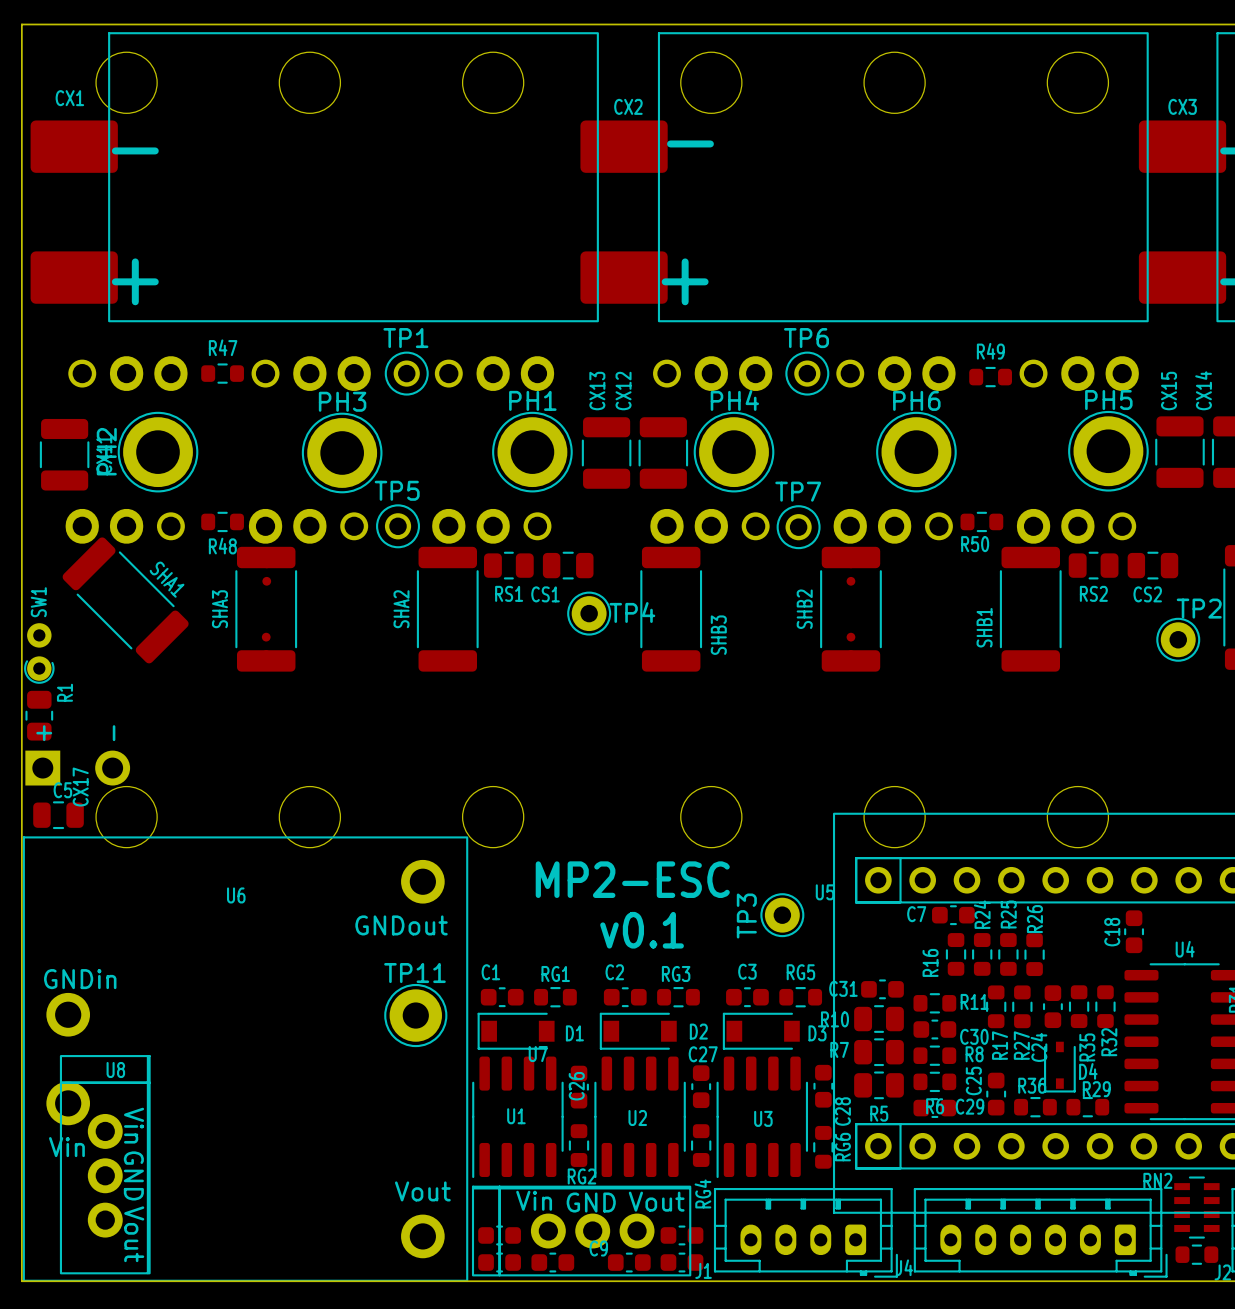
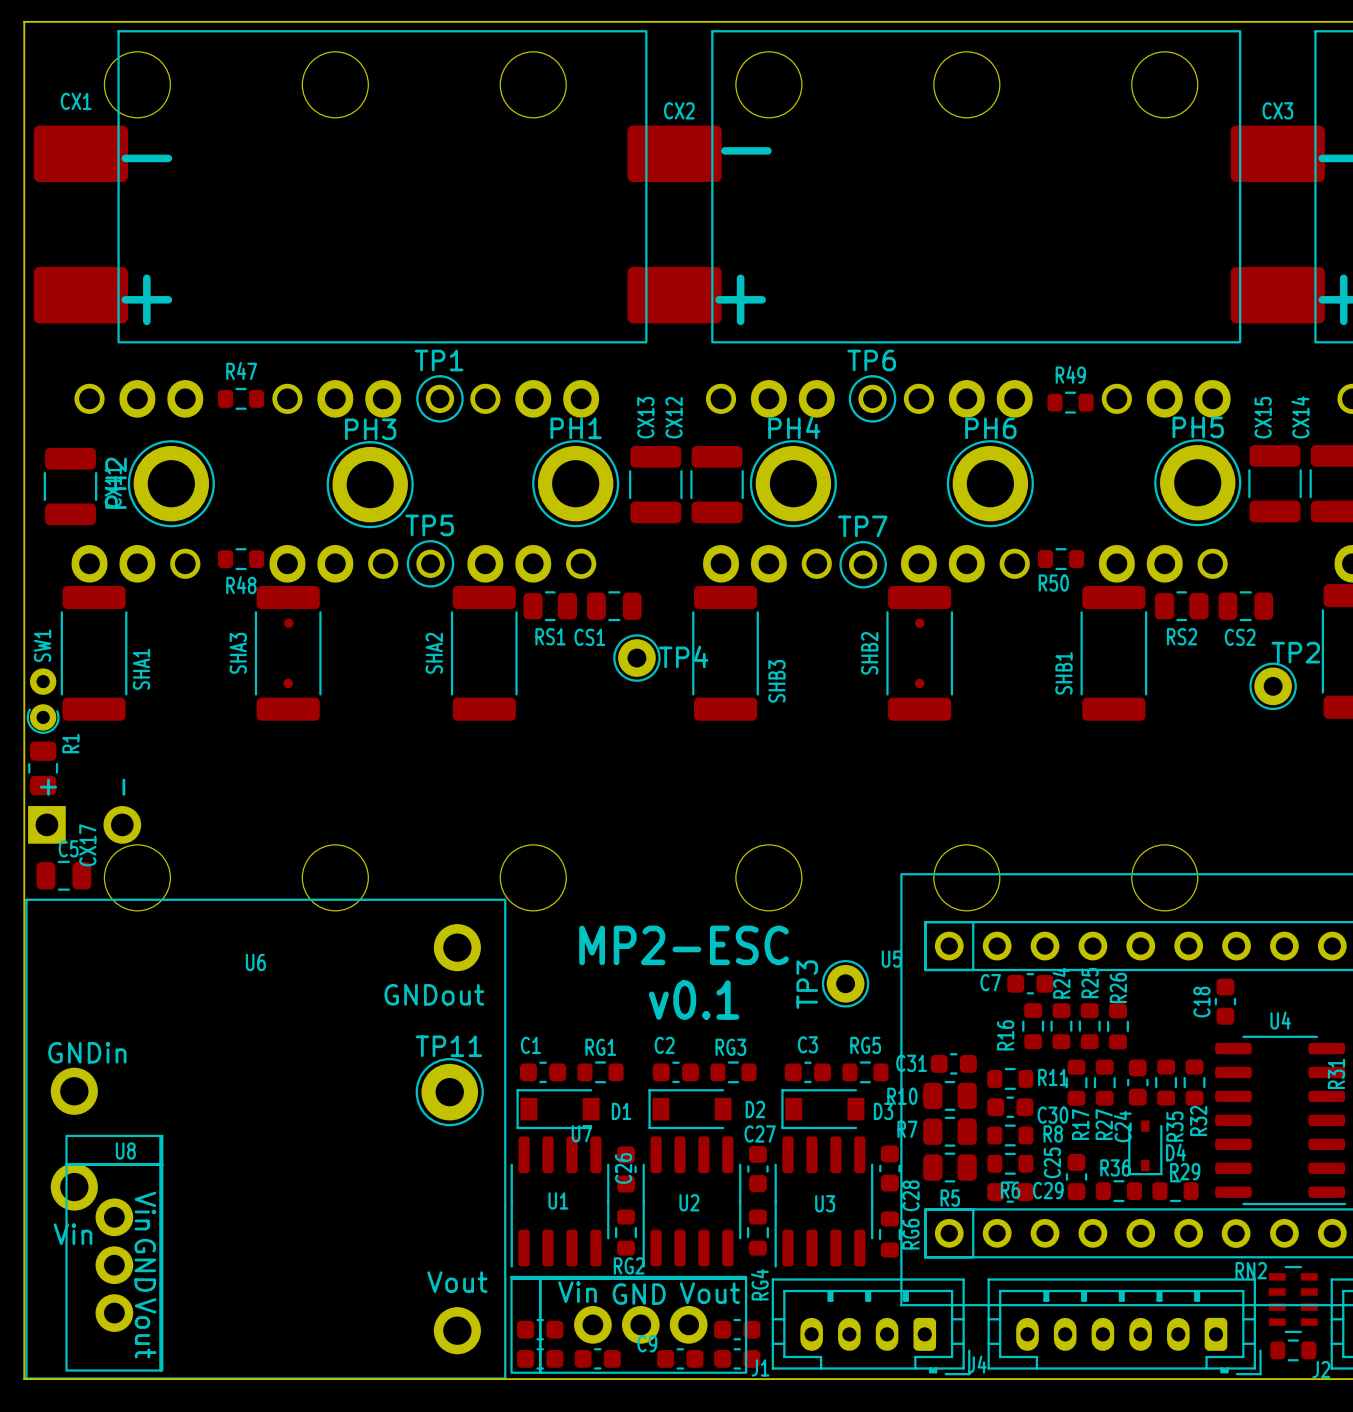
SHA1 rotation: 0° (125, 600) -> 45° clockwise (94, 653)

